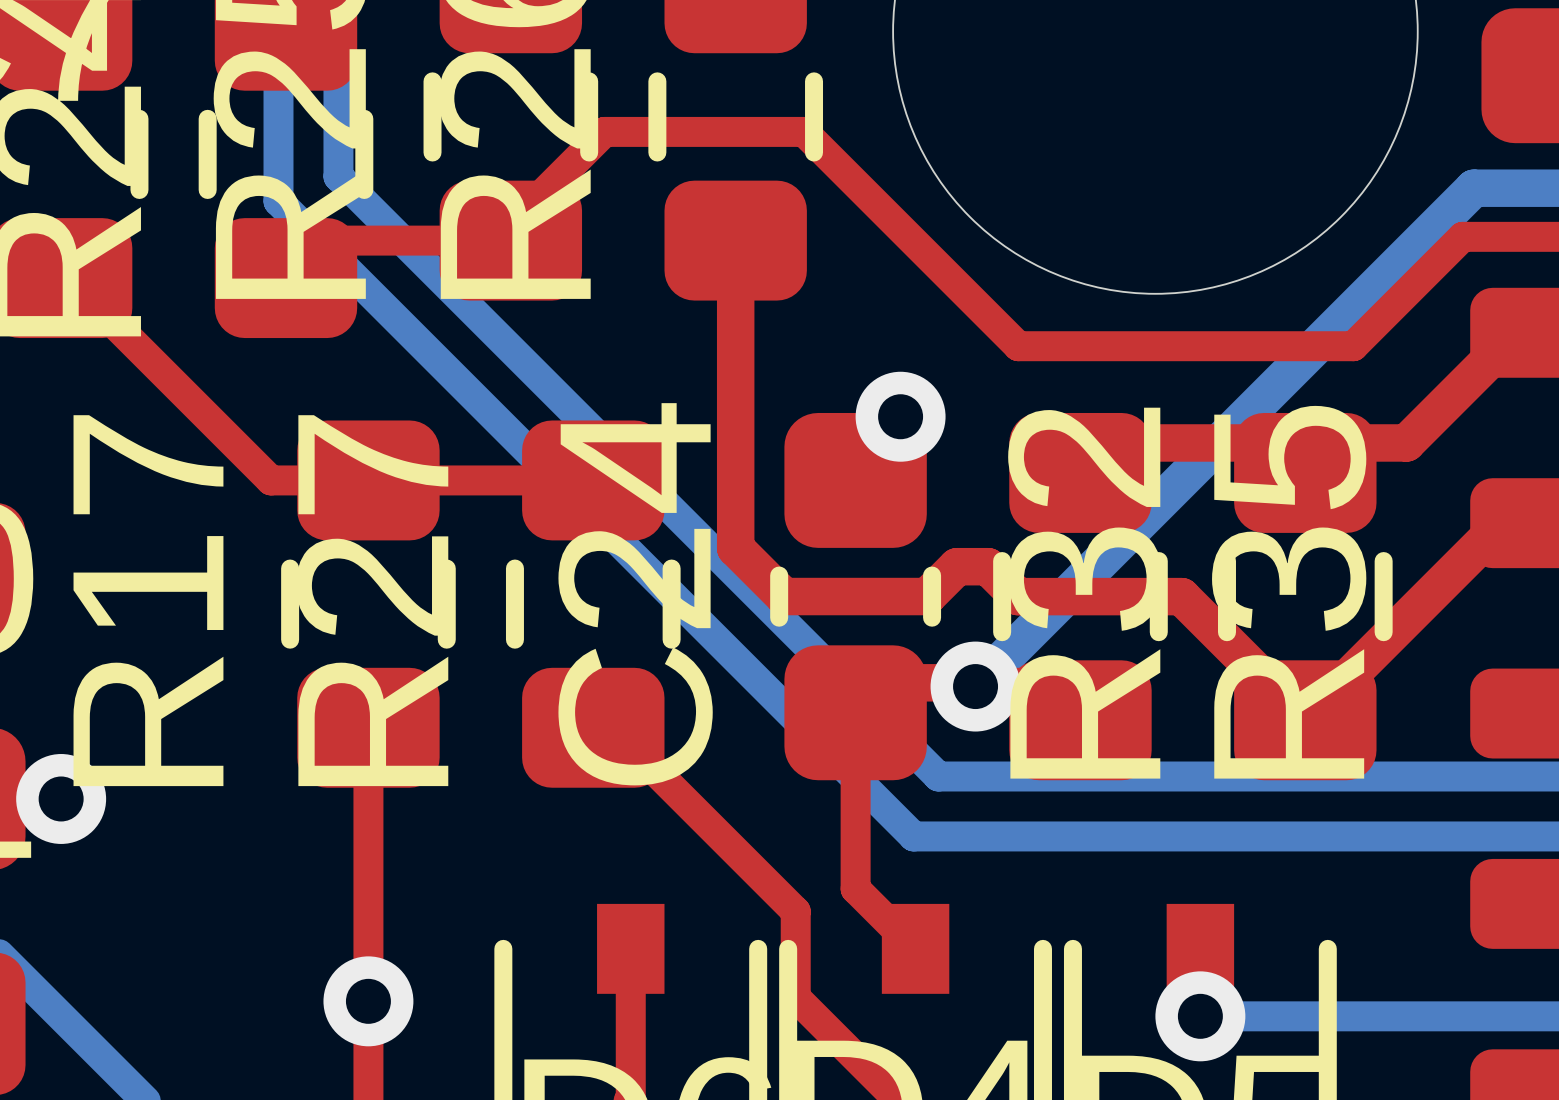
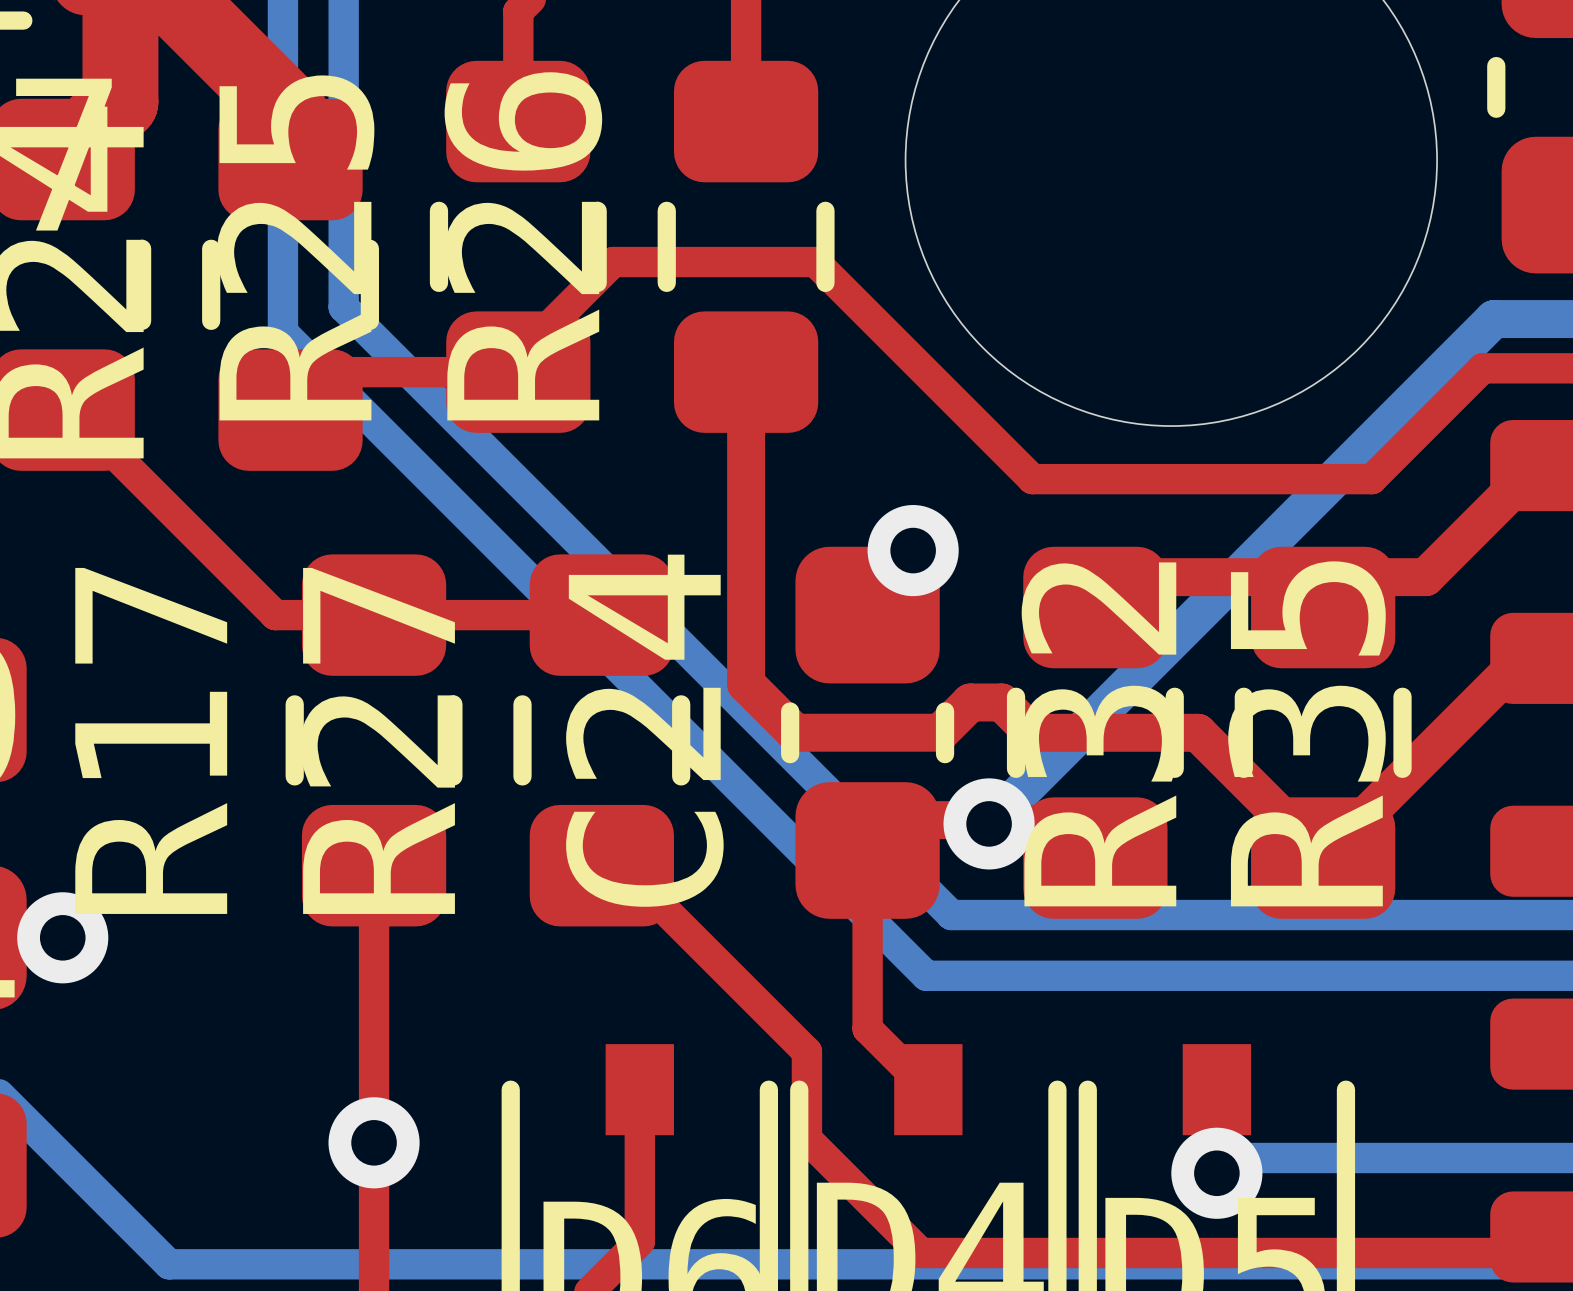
via position: (1200, 1016) -> (1216, 1173)

